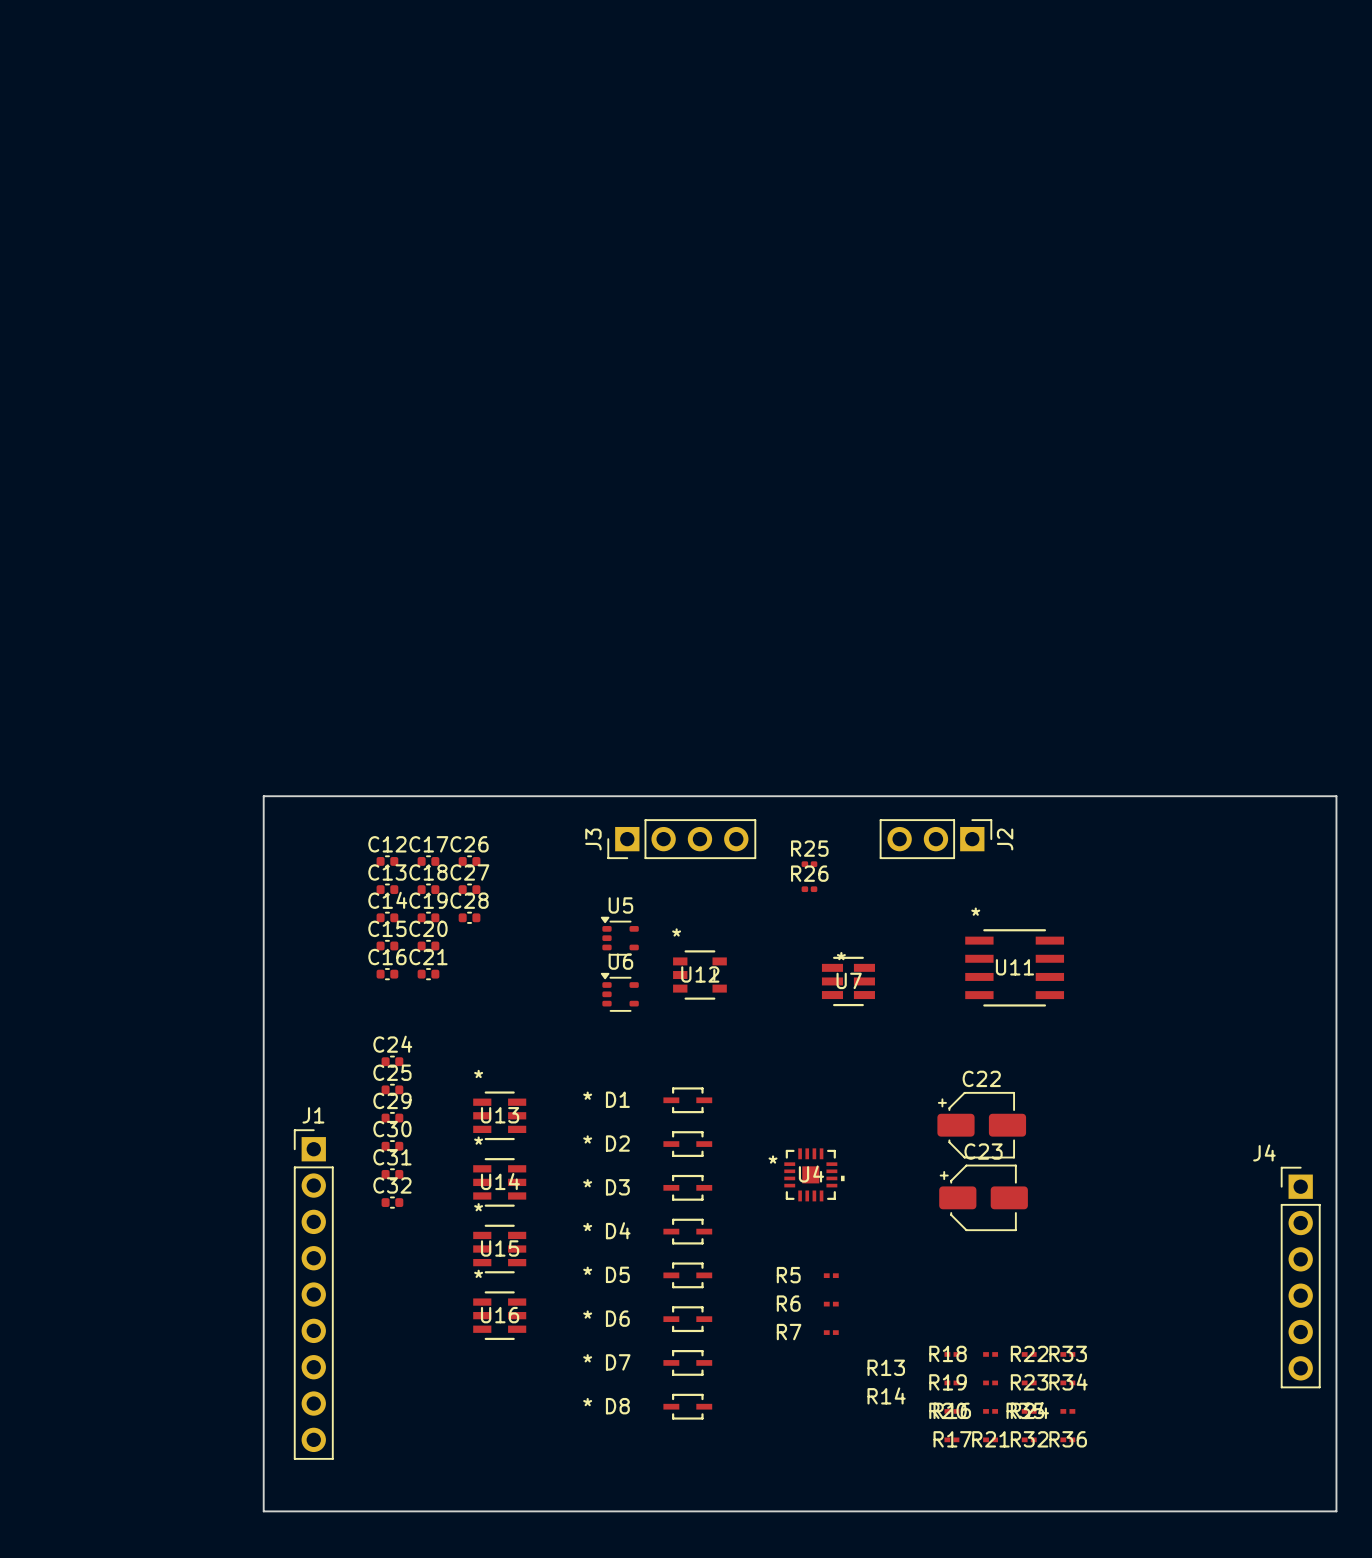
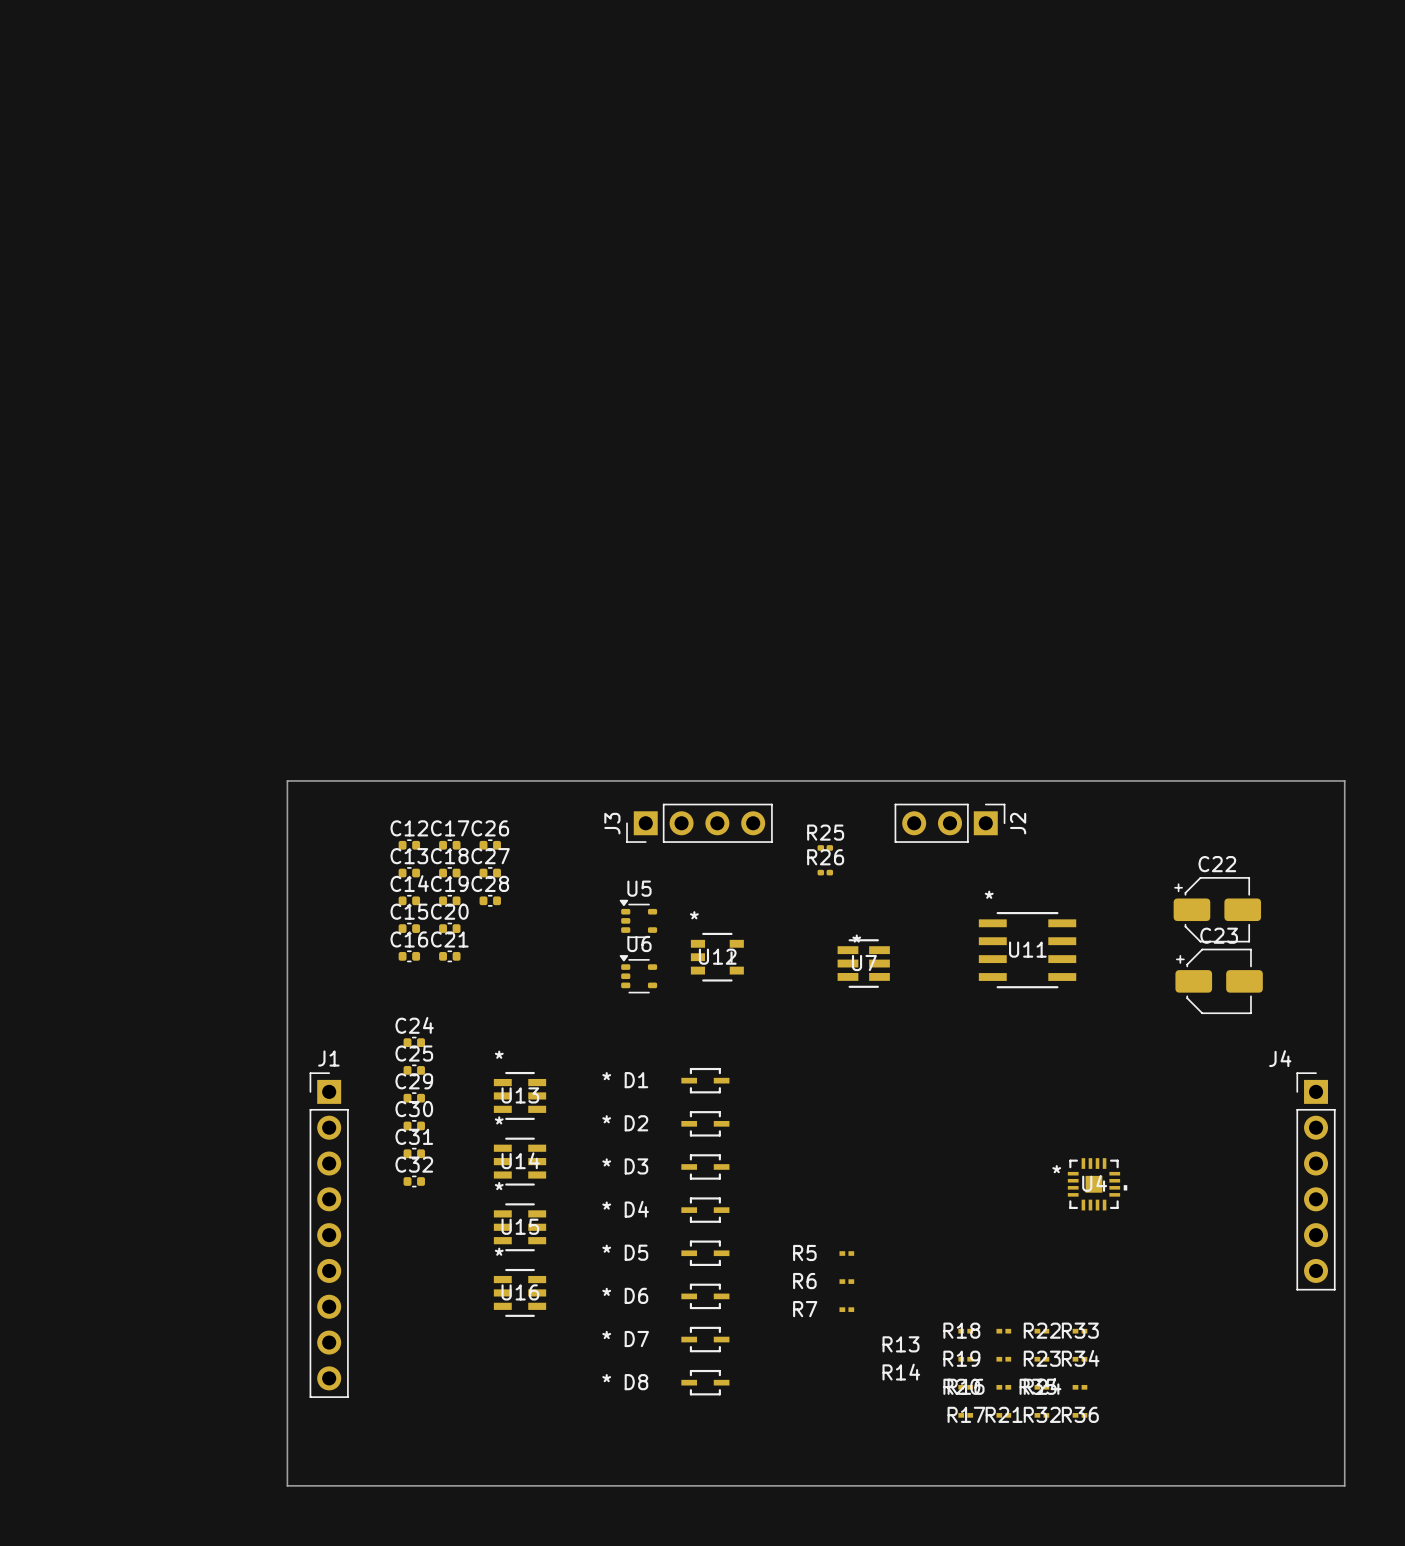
C22 position: (981, 1125) -> (1217, 909)
U4 position: (814, 1174) -> (1097, 1184)
C23 position: (983, 1197) -> (1219, 981)
J4 position: (1300, 1277) -> (1316, 1181)
J1 position: (313, 1294) -> (329, 1235)

